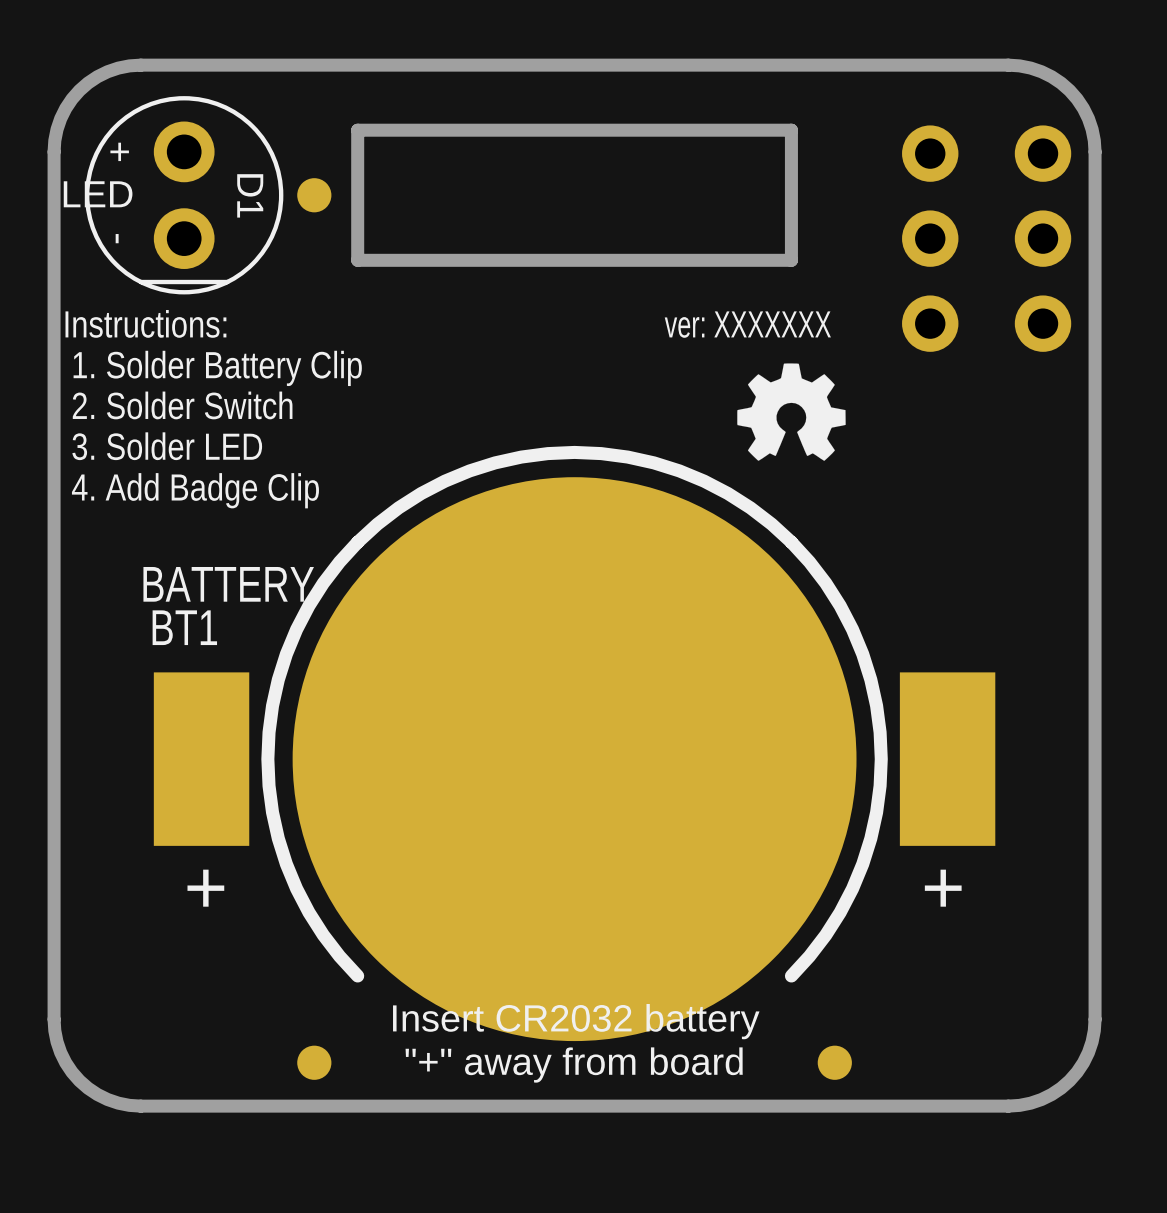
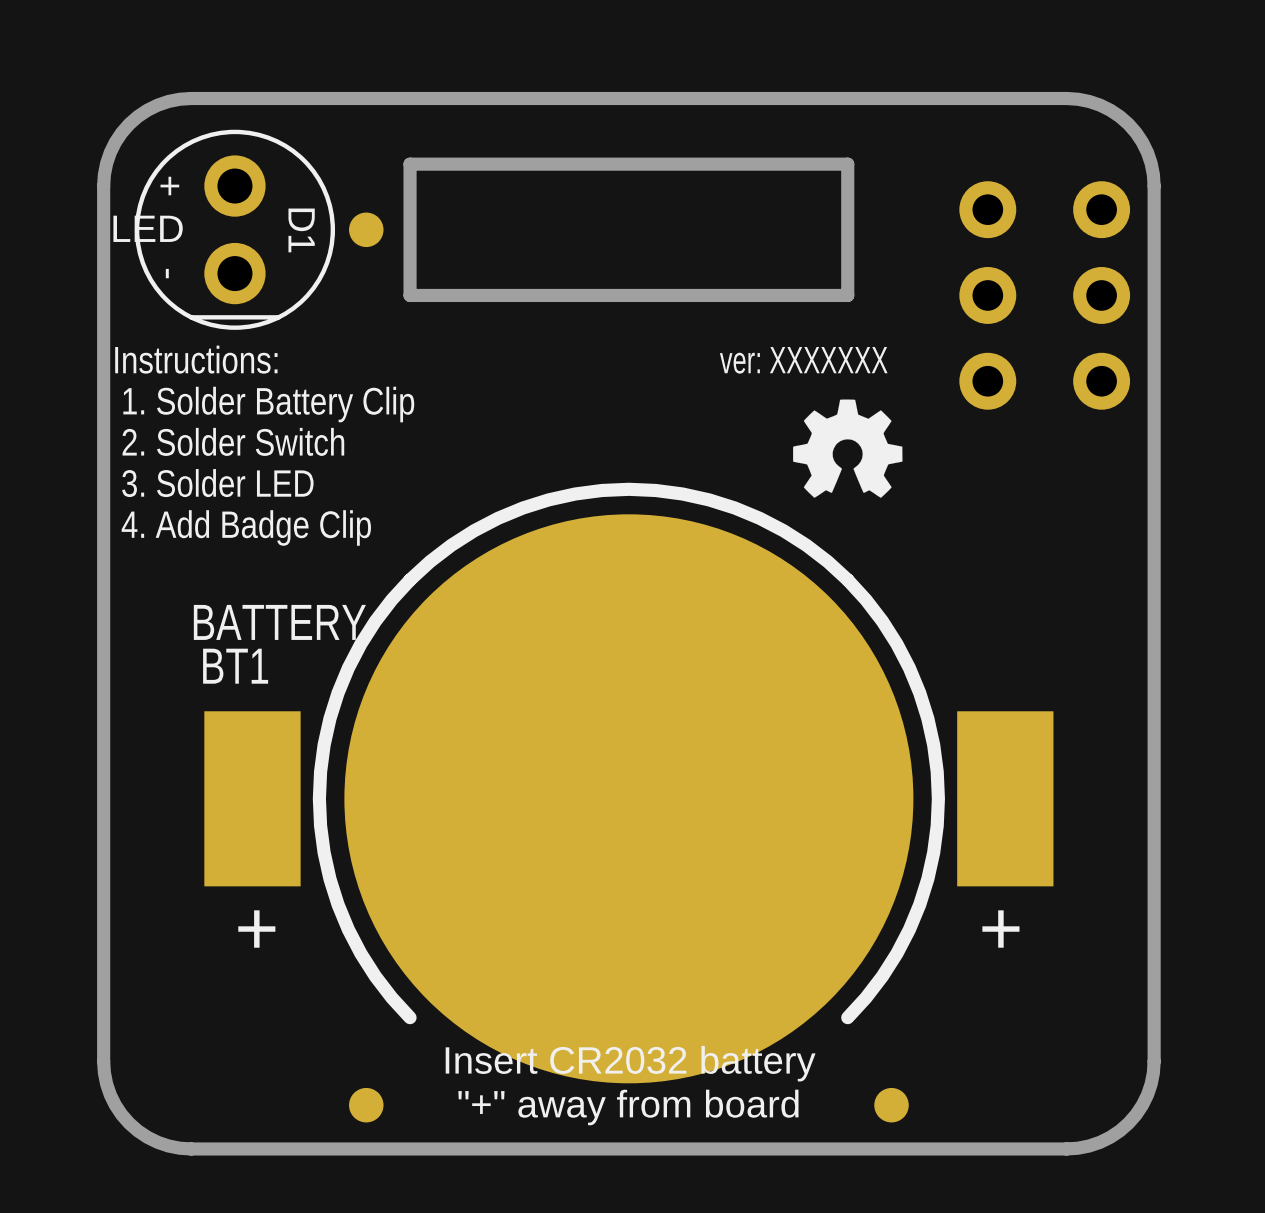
part position: (986, 238) -> (1044, 295)

